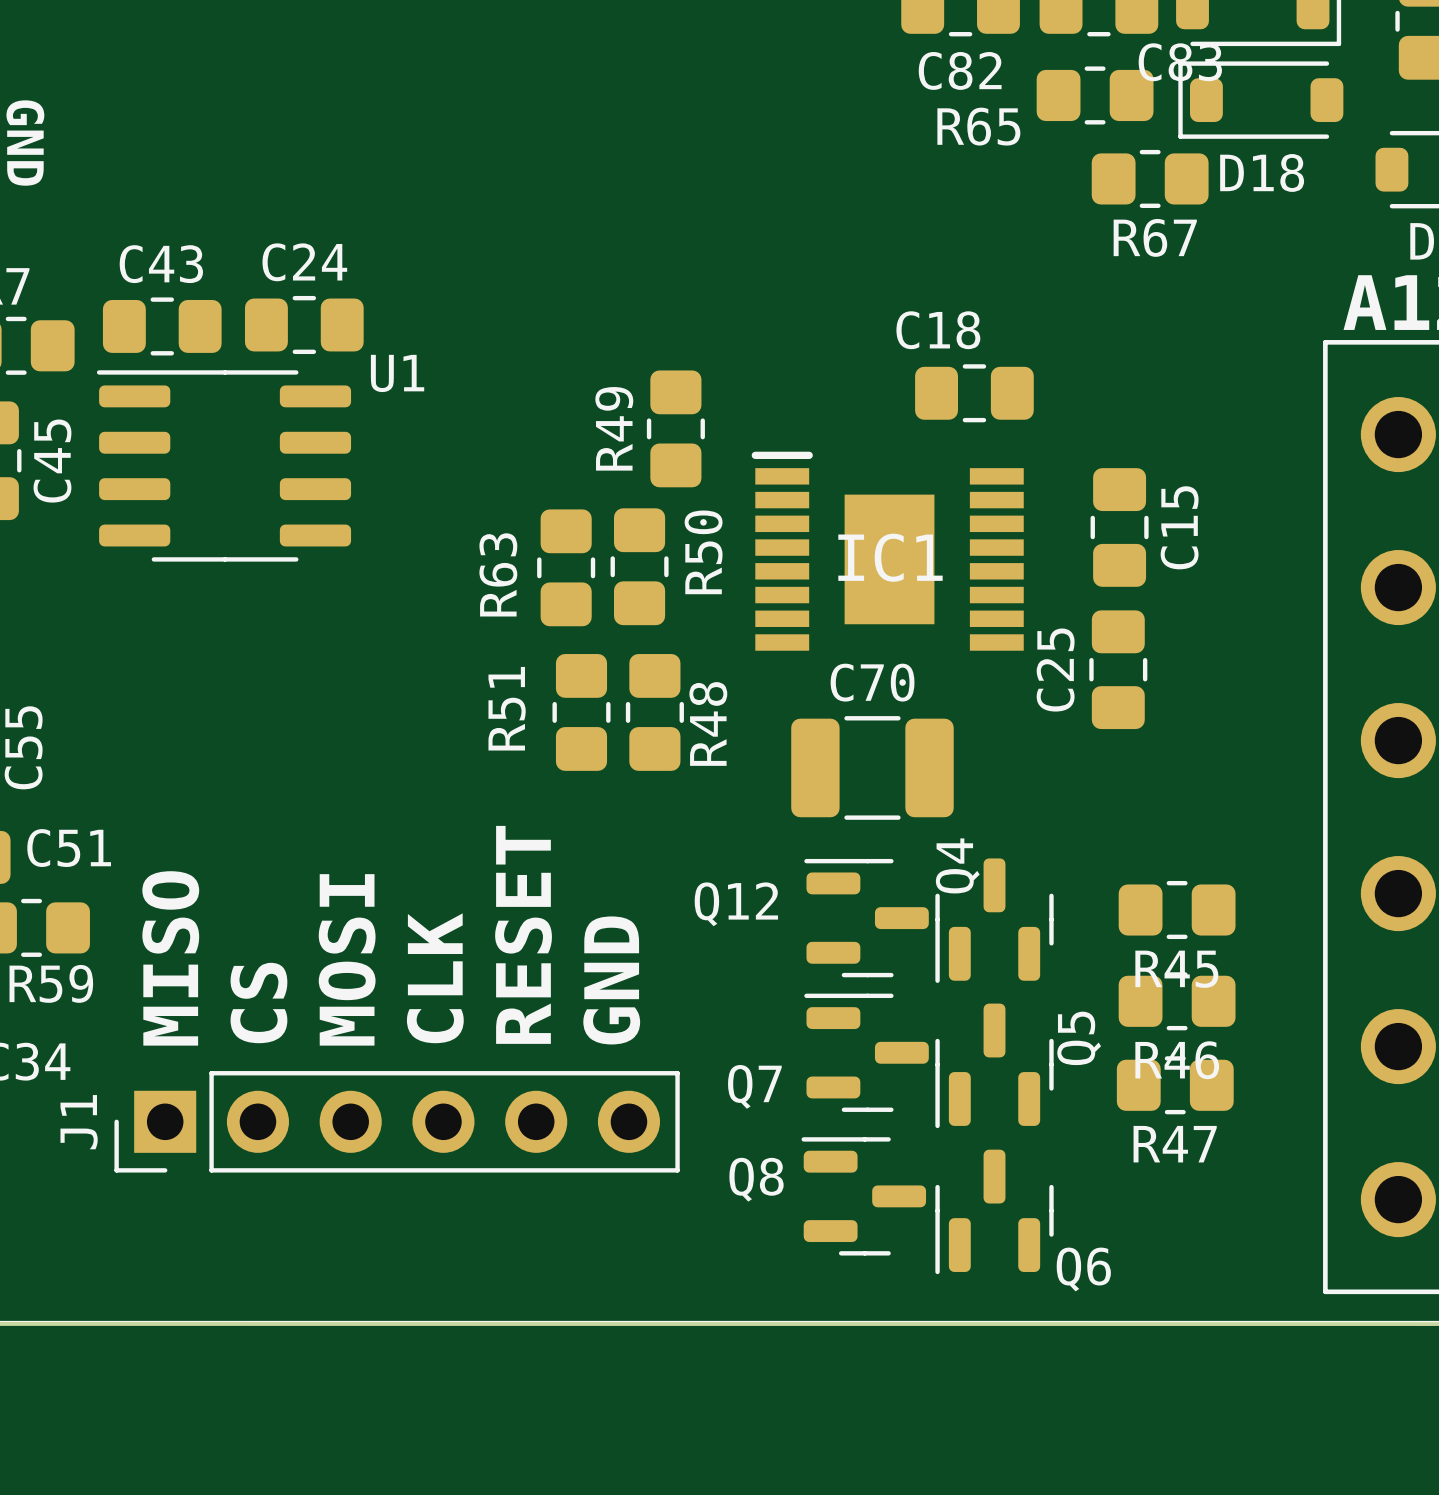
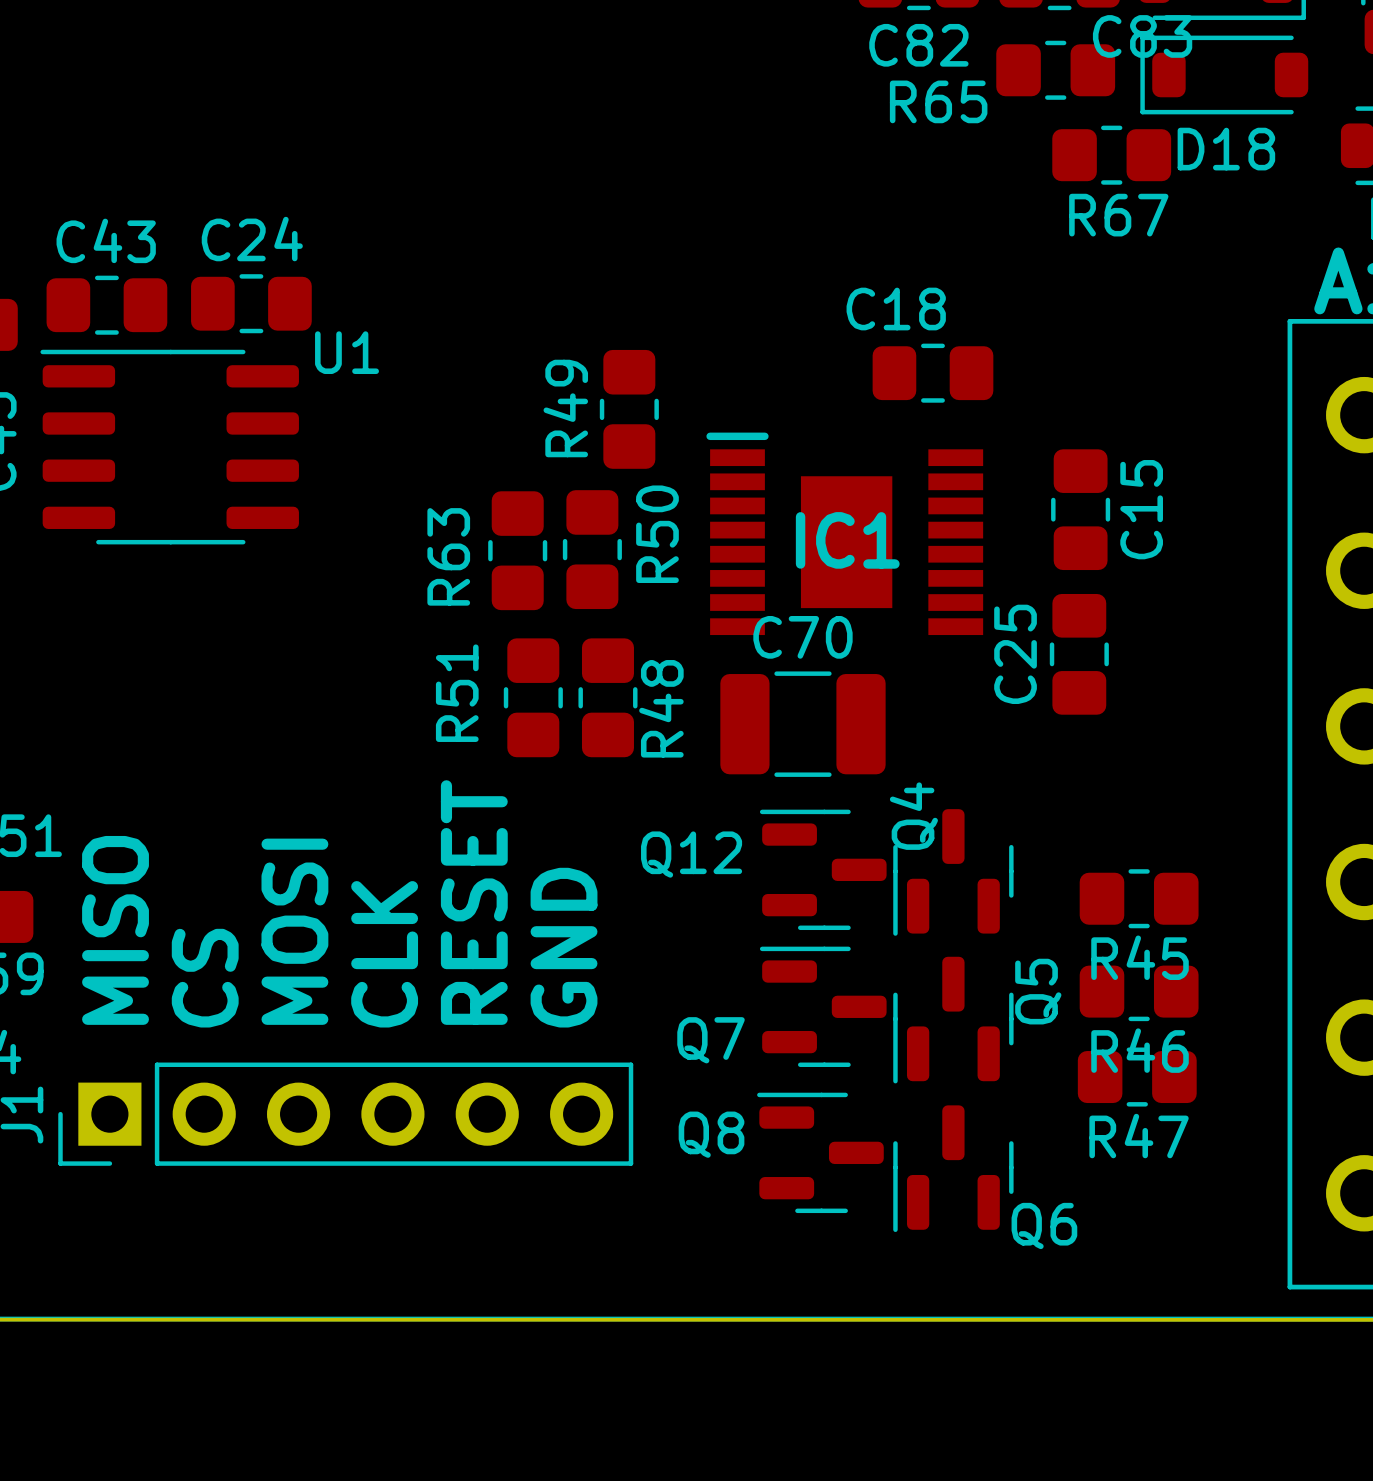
C70 position: (872, 767) -> (802, 724)
Q12 position: (866, 918) -> (823, 869)
Q4 position: (994, 920) -> (953, 872)
Q7 position: (866, 1052) -> (823, 1006)
Q5 position: (994, 1065) -> (953, 1020)
Q8 position: (863, 1196) -> (820, 1152)
Q6 position: (994, 1211) -> (953, 1168)

